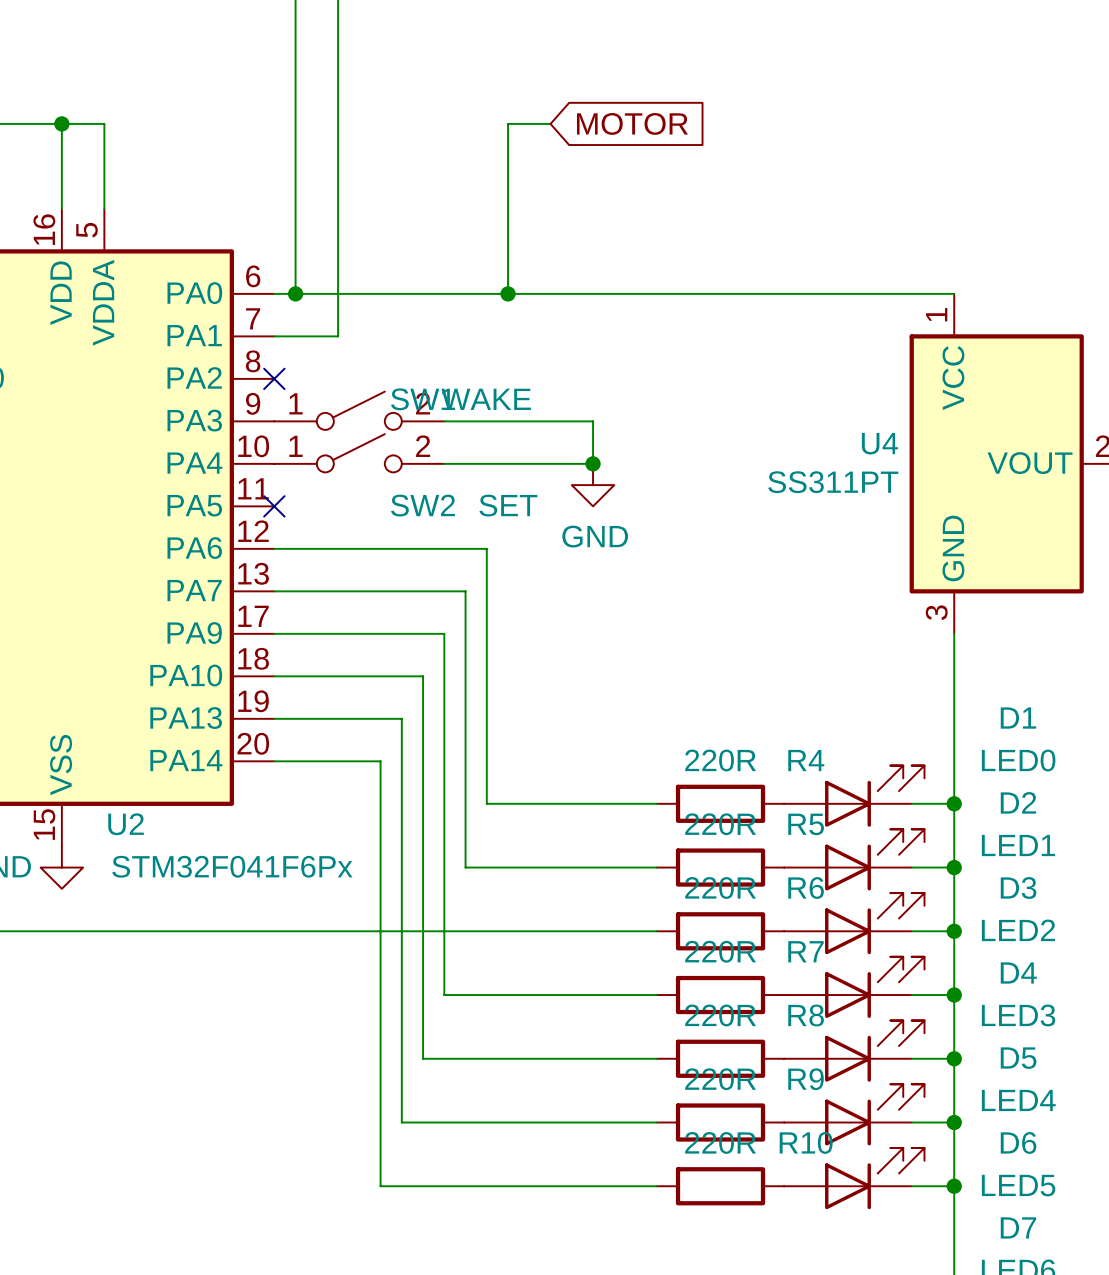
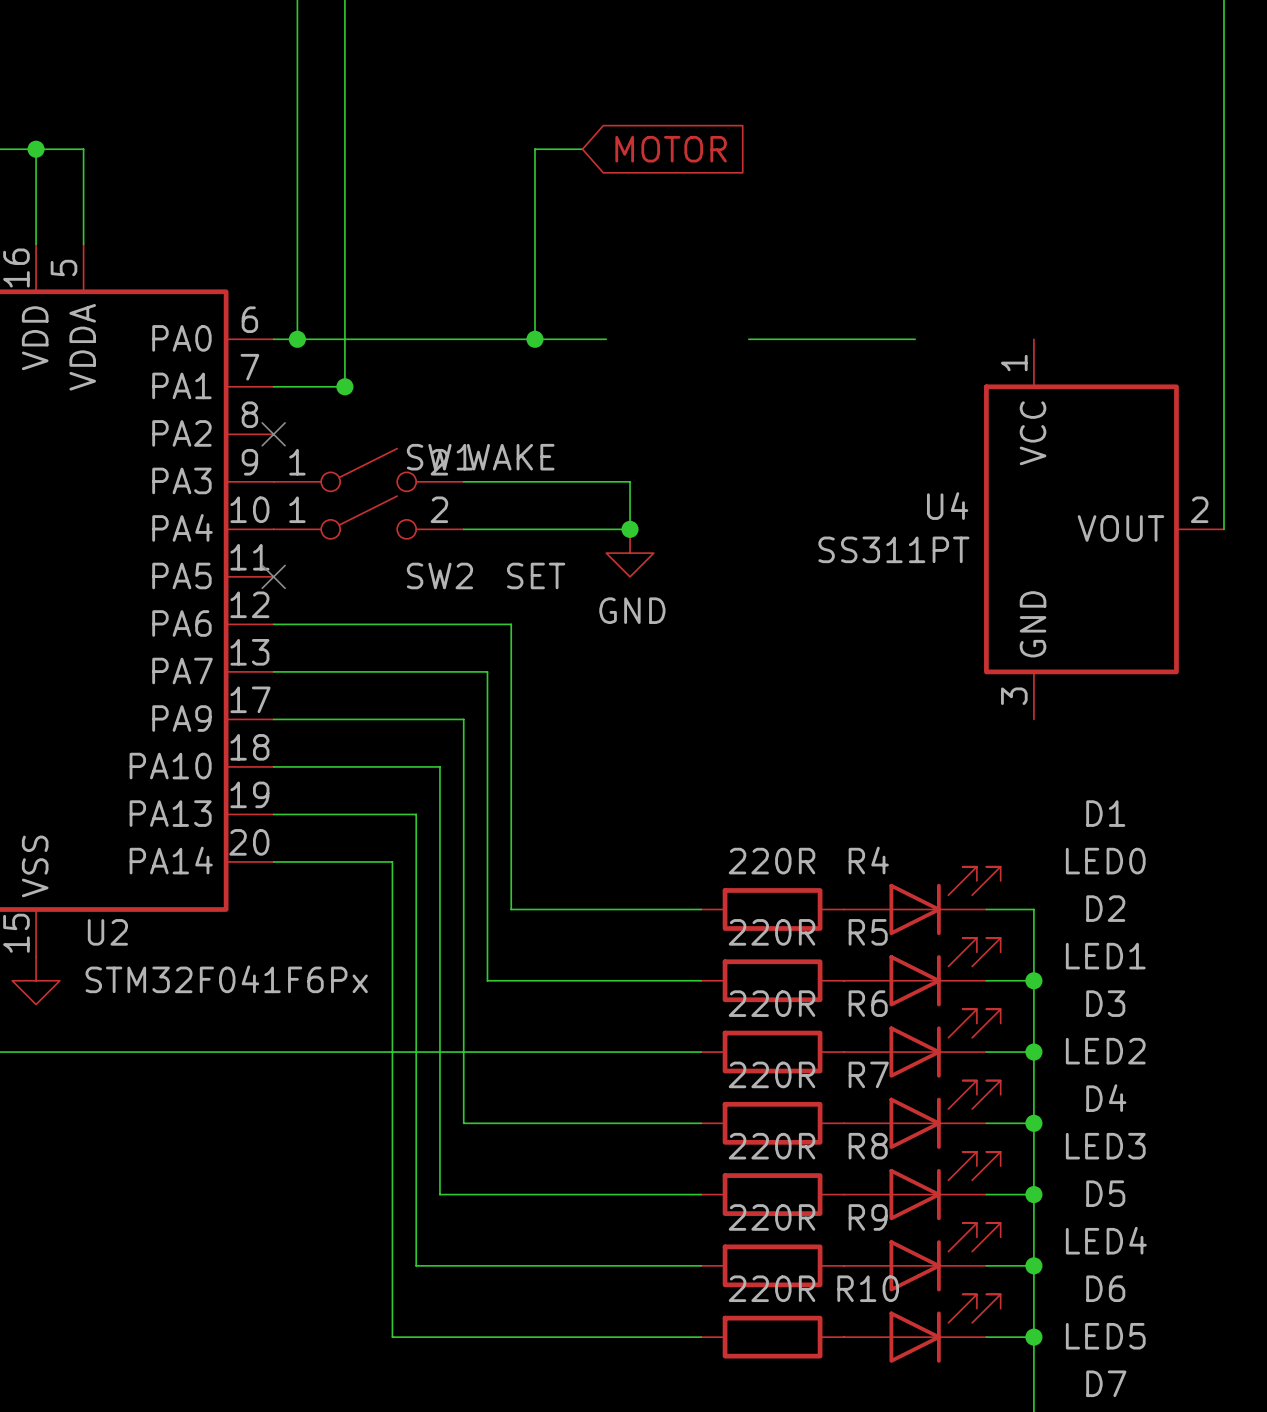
wire: (571, 293) (699, 293) -> none
wire: (847, 293) (954, 293) -> none
junction: none -> (344, 386)
wire: (954, 633) (954, 803) -> none
junction: (954, 803) -> none

